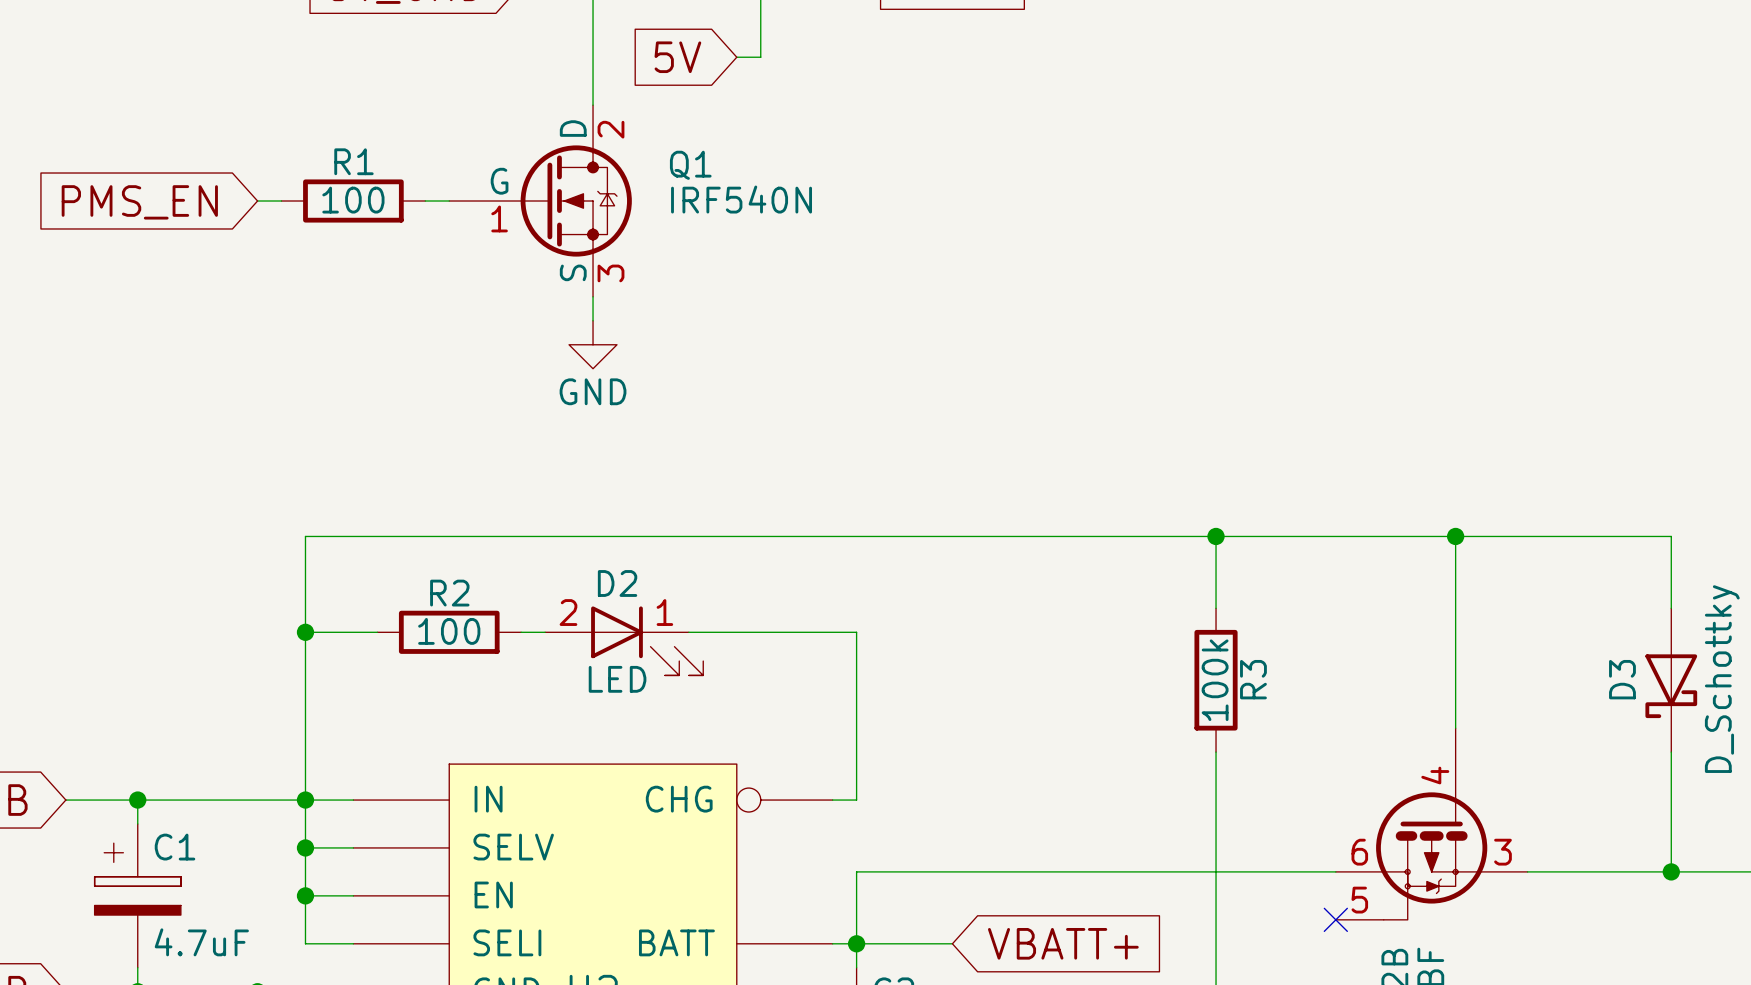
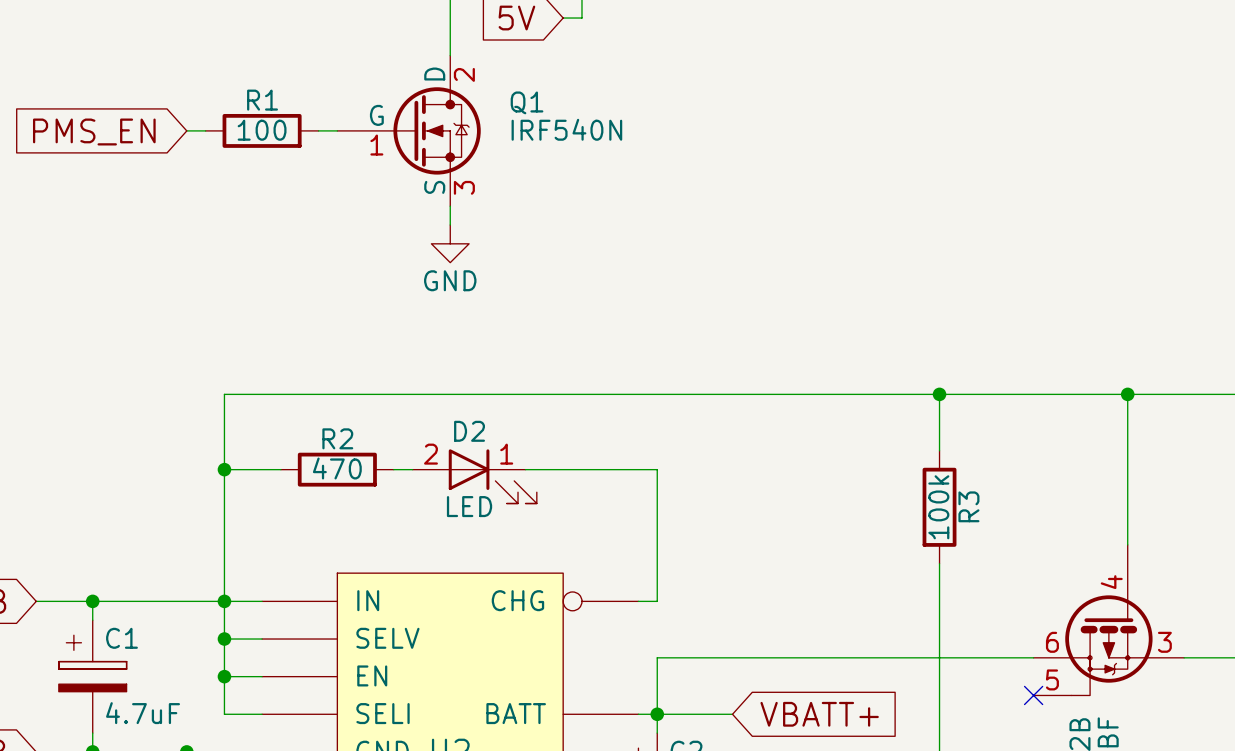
R2 value: 100 (449, 631) -> 470 (337, 468)

